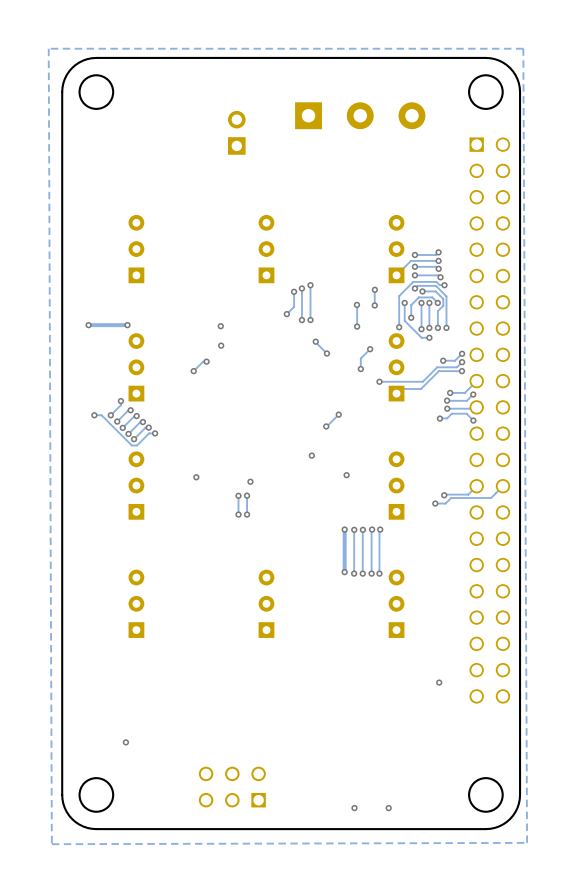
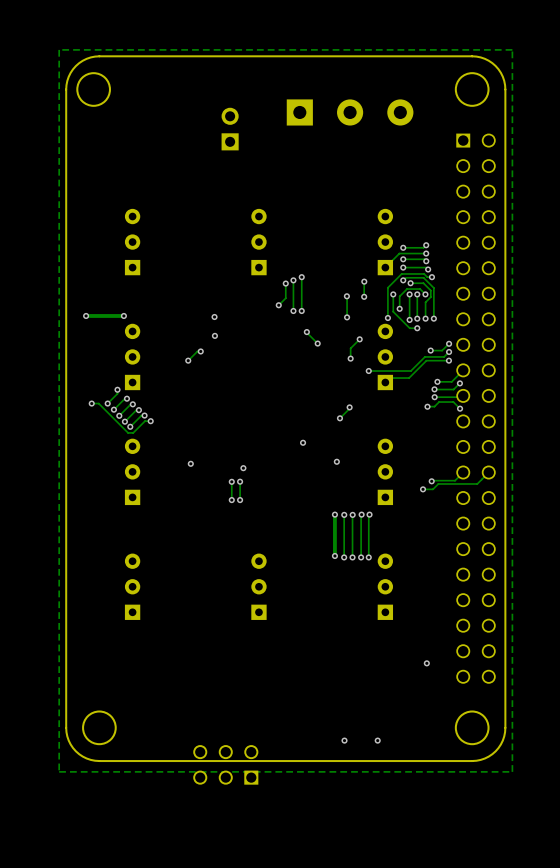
zone outline: (523, 48) (527, 842) (51, 844) (48, 48) (523, 48) -> (512, 49) (512, 771) (59, 771) (59, 49) (512, 49)
board edge: (102, 57) (87, 59) (75, 64) (66, 75) (62, 92) (62, 794) (66, 812) (79, 824) (96, 829) (490, 828) (506, 822) (517, 808) (520, 794) (520, 748) -> (99, 56) (86, 58) (75, 66) (68, 76) (66, 89) (66, 727) (70, 744) (82, 756) (99, 761) (472, 761) (484, 758) (495, 751) (502, 740) (505, 727)
track: (338, 414) (326, 426) -> none
via: (338, 414) -> none
track: none -> (349, 407) (339, 418)
via: none -> (349, 407)
via: (326, 426) -> none
via: none -> (339, 418)
via: (125, 742) -> none
via: none -> (344, 740)
via: none -> (377, 740)
round board edge position: (96, 794) -> (99, 727)
round board edge position: (485, 794) -> (472, 727)
via: (354, 808) -> none
via: (388, 808) -> none

